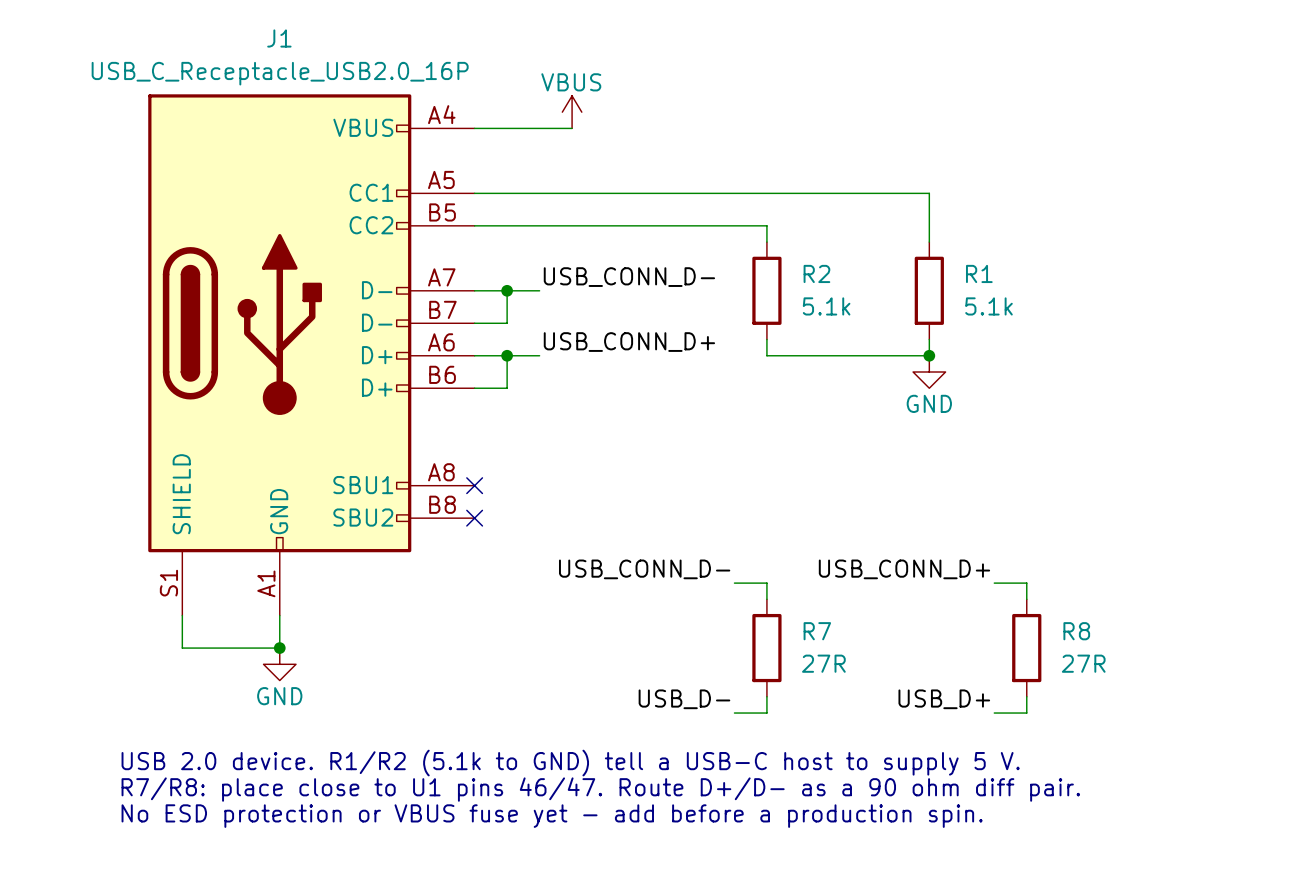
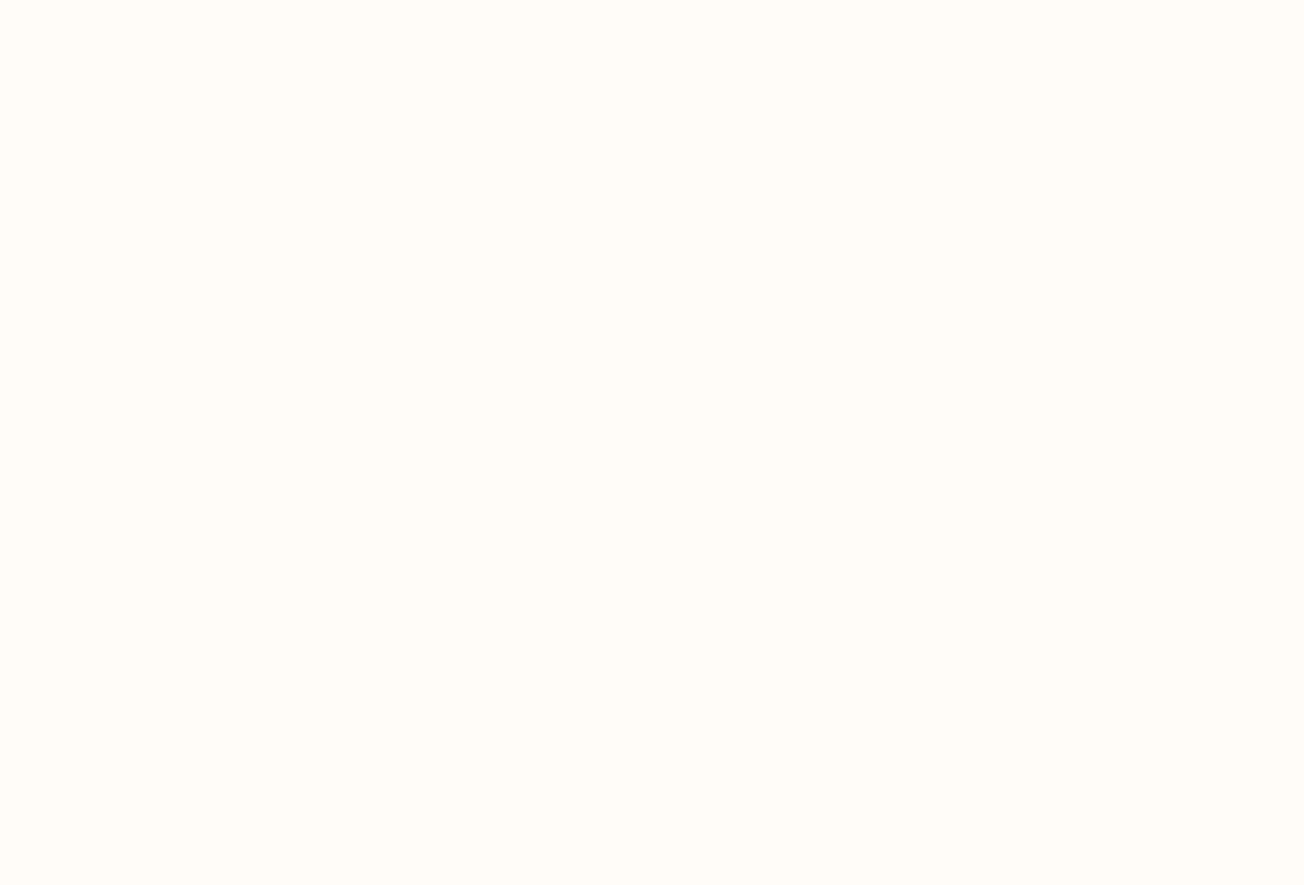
power symbol: VBUS (572, 112) -> none
wire: (474, 128) (572, 128) -> none
wire: (474, 193) (929, 193) (929, 242) -> none
wire: (474, 225) (766, 225) (766, 242) -> none
label: USB_CONN_D- (629, 277) -> none
wire: (474, 290) (539, 290) -> none
wire: (507, 290) (507, 323) (474, 323) -> none
junction: (507, 290) -> none
R2: 5.1k (766, 290) -> none
R1: 5.1k (929, 290) -> none
wire: (766, 339) (766, 355) (929, 355) (929, 339) -> none
label: USB_CONN_D+ (629, 342) -> none
J1: USB_C_Receptacle_USB2.0_16P (311, 354) -> none
wire: (474, 355) (539, 355) -> none
wire: (507, 355) (507, 388) (474, 388) -> none
junction: (507, 355) -> none
junction: (929, 355) -> none
power symbol: GND (929, 372) -> none
no-connect mark: (474, 485) -> none
no-connect mark: (474, 518) -> none
label: USB_CONN_D- (644, 569) -> none
label: USB_CONN_D+ (904, 569) -> none
wire: (734, 583) (766, 583) (766, 599) -> none
wire: (994, 583) (1026, 583) (1026, 599) -> none
wire: (182, 615) (182, 648) (279, 648) (279, 615) -> none
junction: (279, 648) -> none
R7: 27R (766, 648) -> none
R8: 27R (1026, 648) -> none
power symbol: GND (279, 664) -> none
wire: (766, 696) (766, 713) (734, 713) -> none
wire: (1026, 696) (1026, 713) (994, 713) -> none
label: USB_D- (684, 699) -> none
label: USB_D+ (944, 699) -> none
text: USB 2.0 device. R1/R2 (5.1k to GND) tell a USB-C host to supply 5 V. (570, 763) -> none
text: R7/R8: place close to U1 pins 46/47. Route D+/D- as a 90 ohm diff pair. (600, 789) -> none
text: No ESD protection or VBUS fuse yet - add before a production spin. (552, 816) -> none

